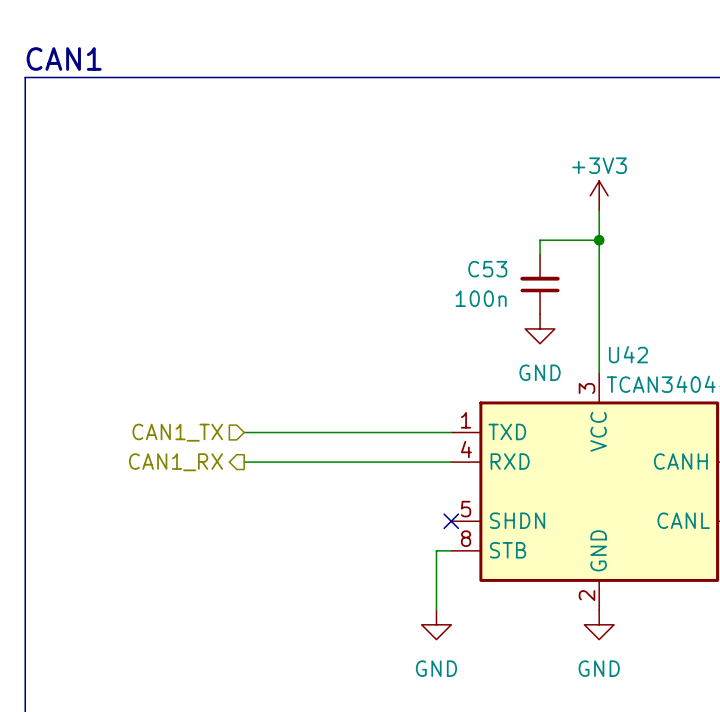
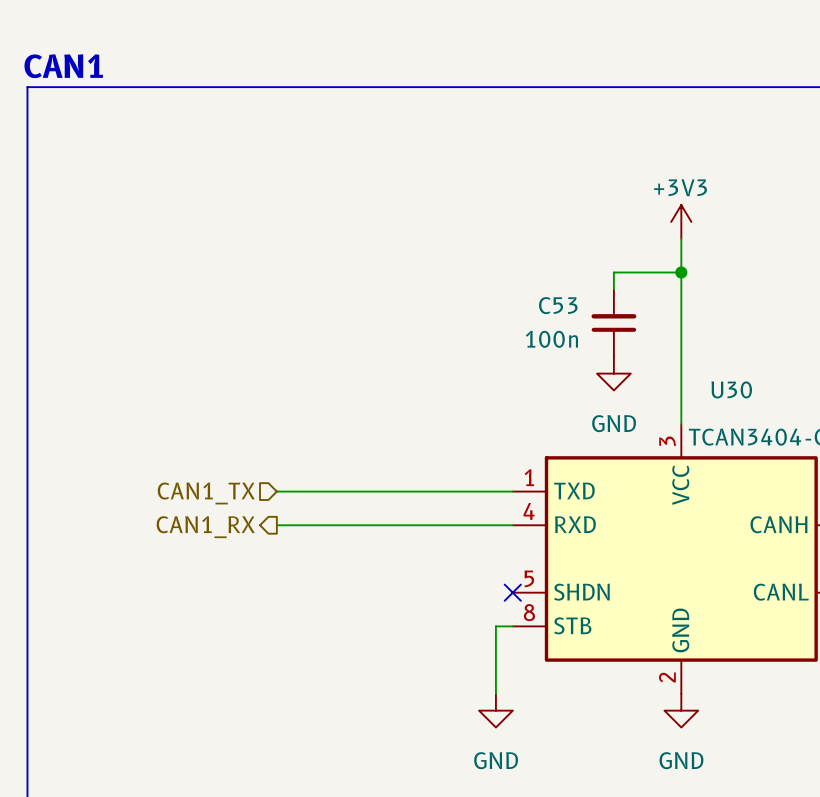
U42 name: U42 (628, 354) -> U30 (731, 389)

